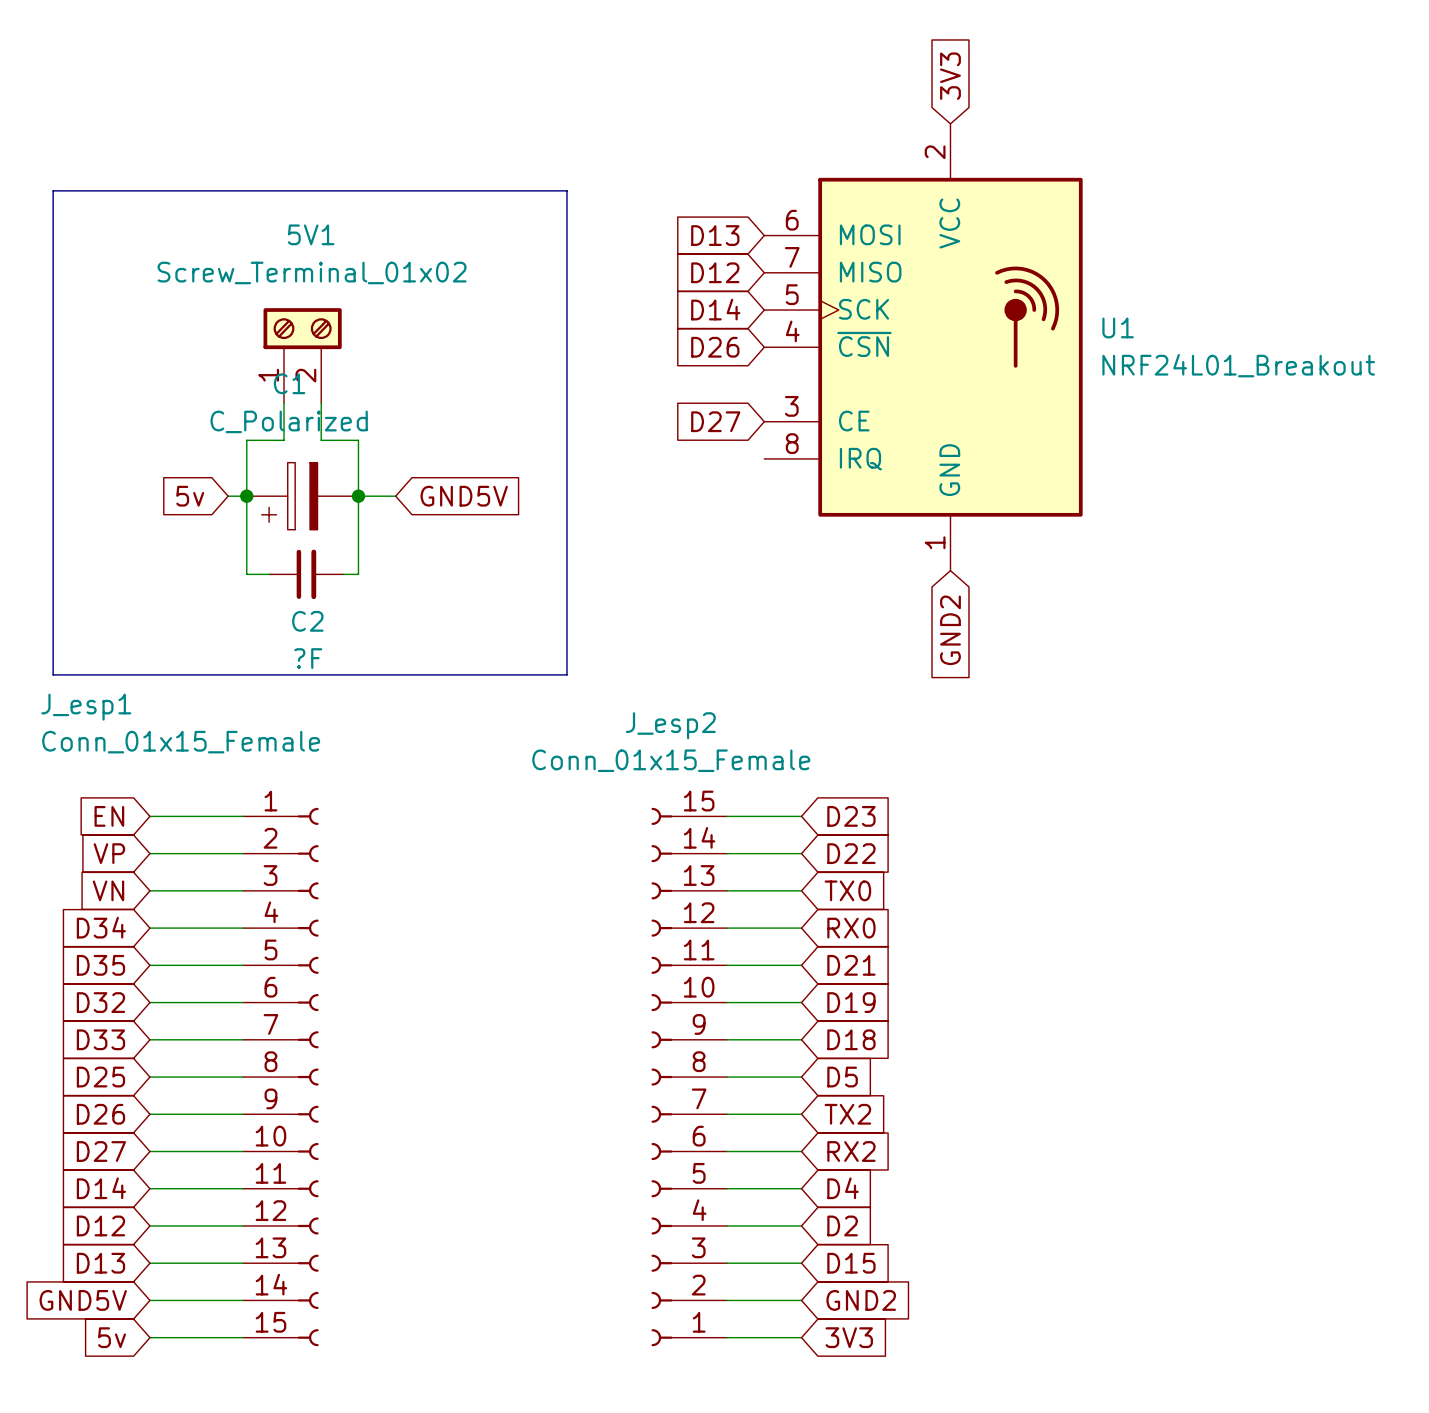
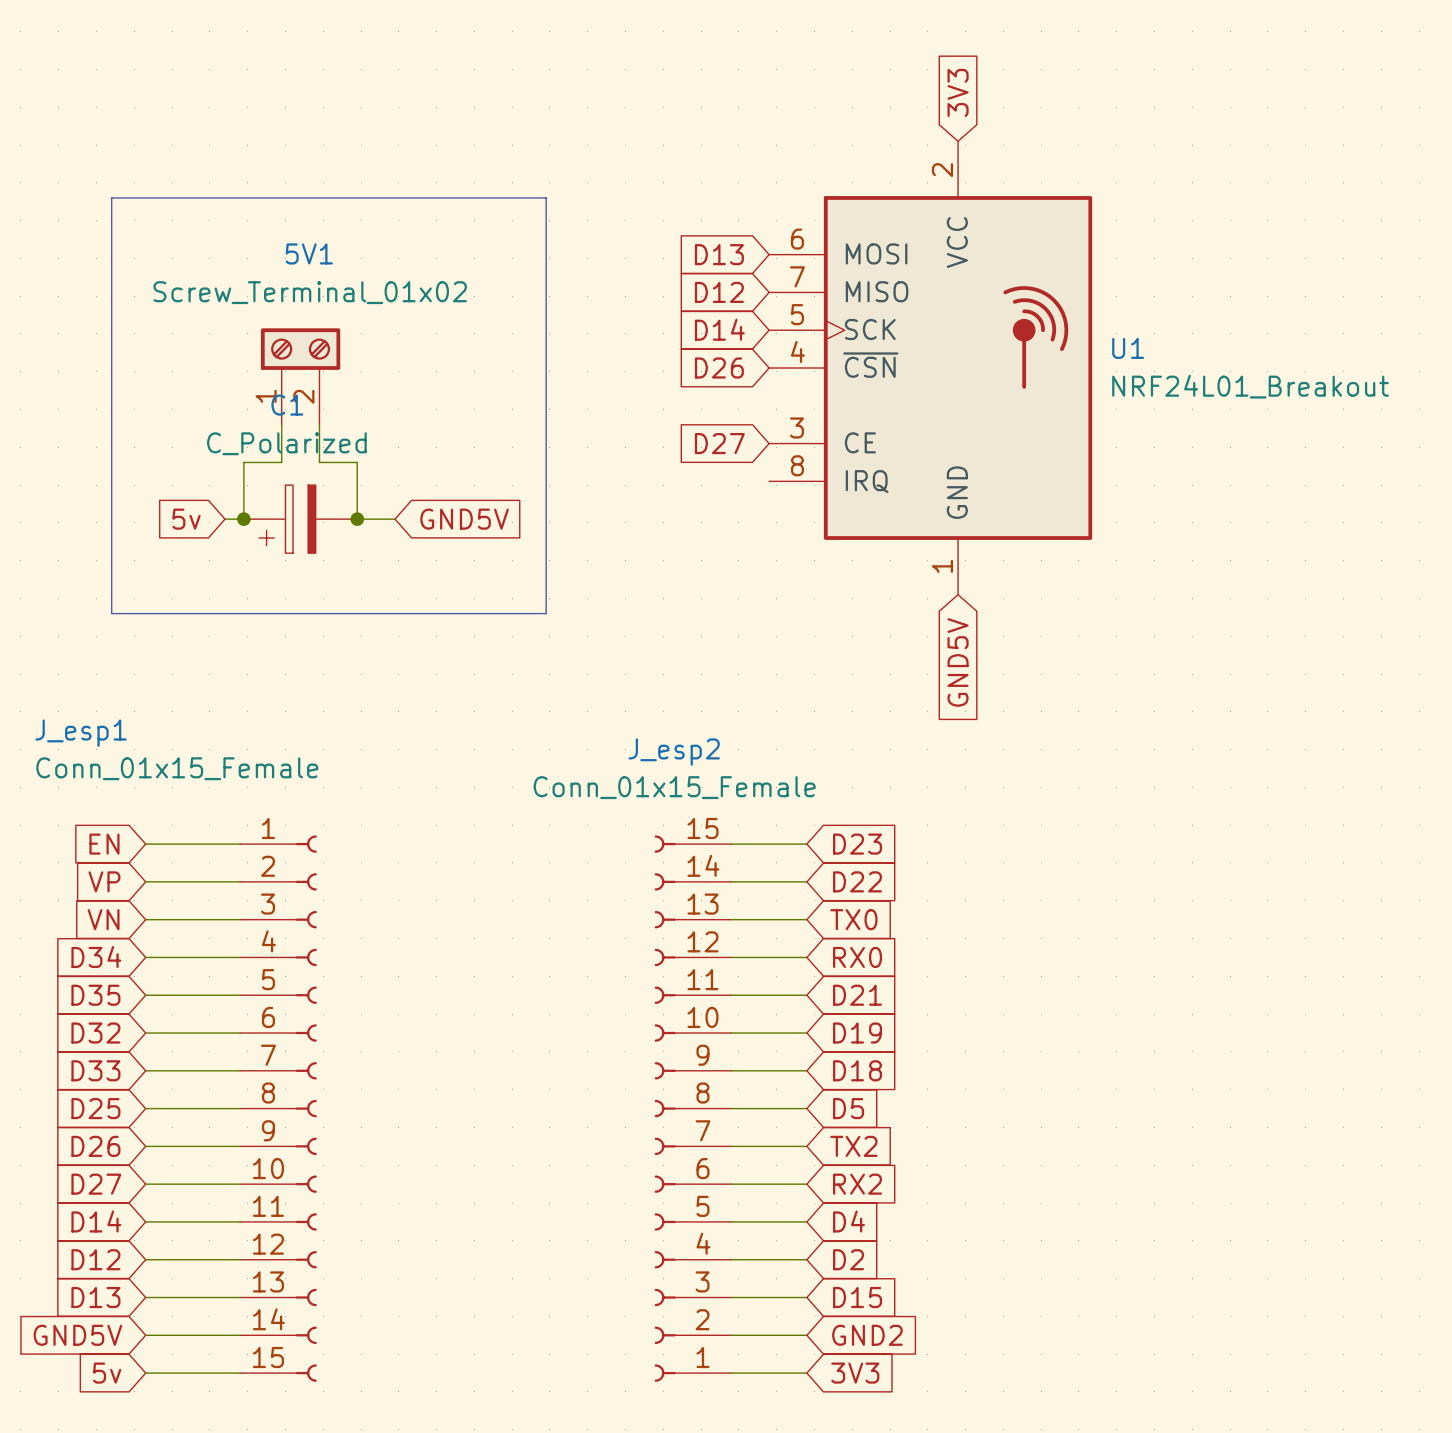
line: (53, 190) (566, 190) (566, 674) (53, 674) (53, 190) -> (111, 197) (111, 613) (546, 613) (546, 197) (111, 197)
wire: (246, 496) (246, 574) (269, 574) -> none
wire: (358, 496) (358, 574) (343, 574) -> none
C2: (306, 574) -> none
global label: GND2 (950, 630) -> GND5V (958, 662)

